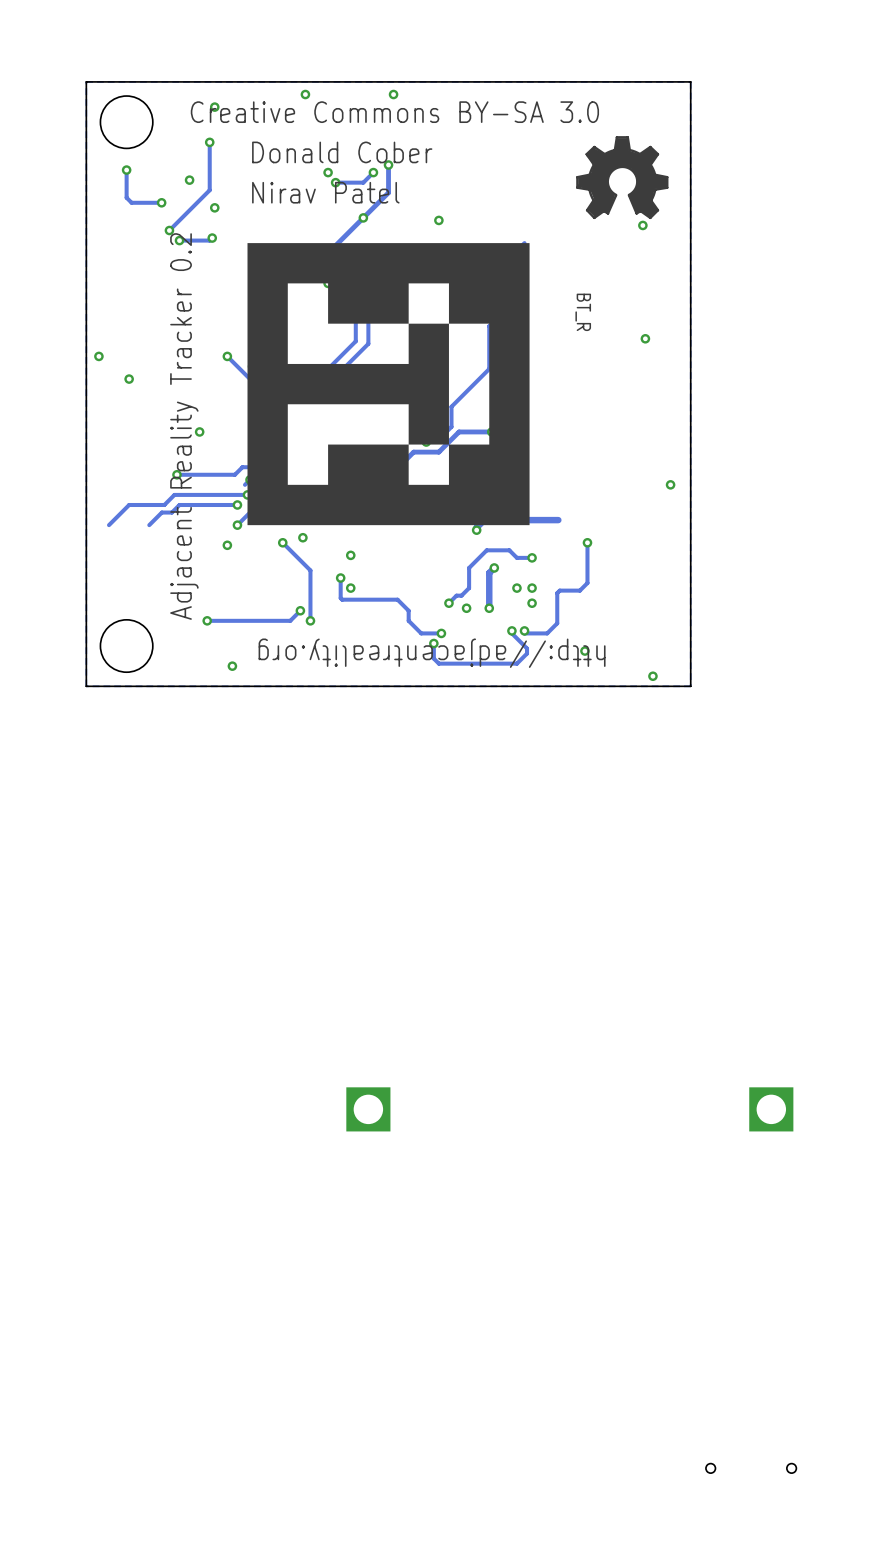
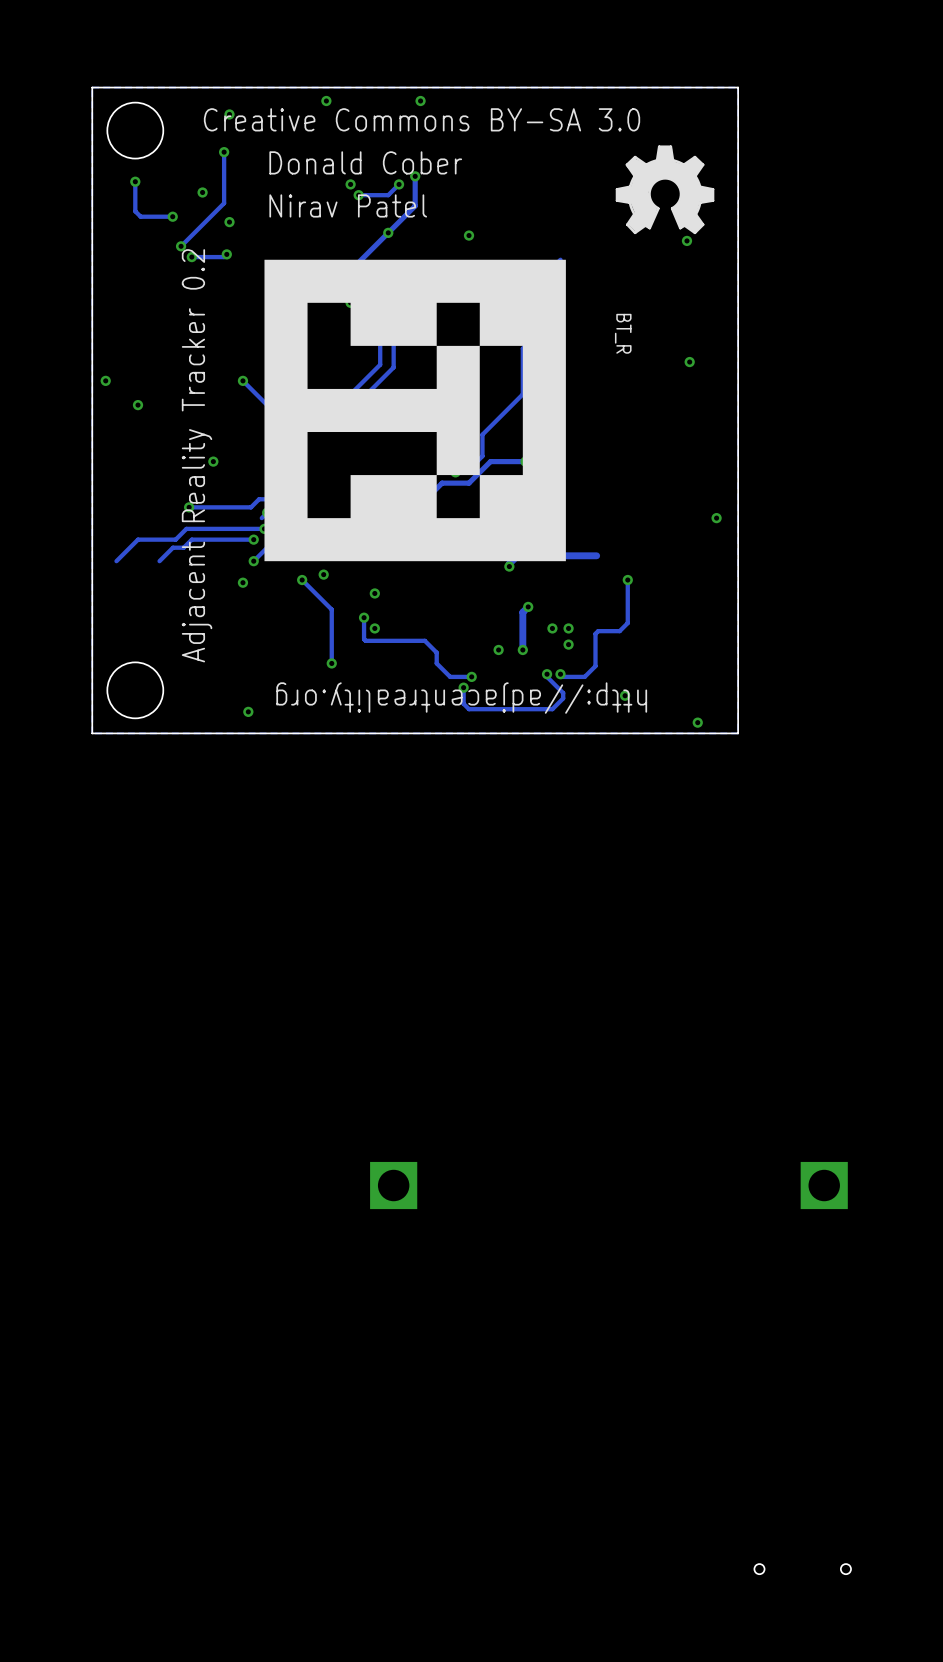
track: (532, 557) (516, 557) (509, 550) (486, 550) (469, 567) (469, 588) (461, 595) (456, 595) (448, 603) -> none
via: (532, 557) -> none
via: (448, 603) -> none
track: (300, 610) (290, 620) (207, 620) -> none
via: (300, 610) -> none
via: (207, 620) -> none

